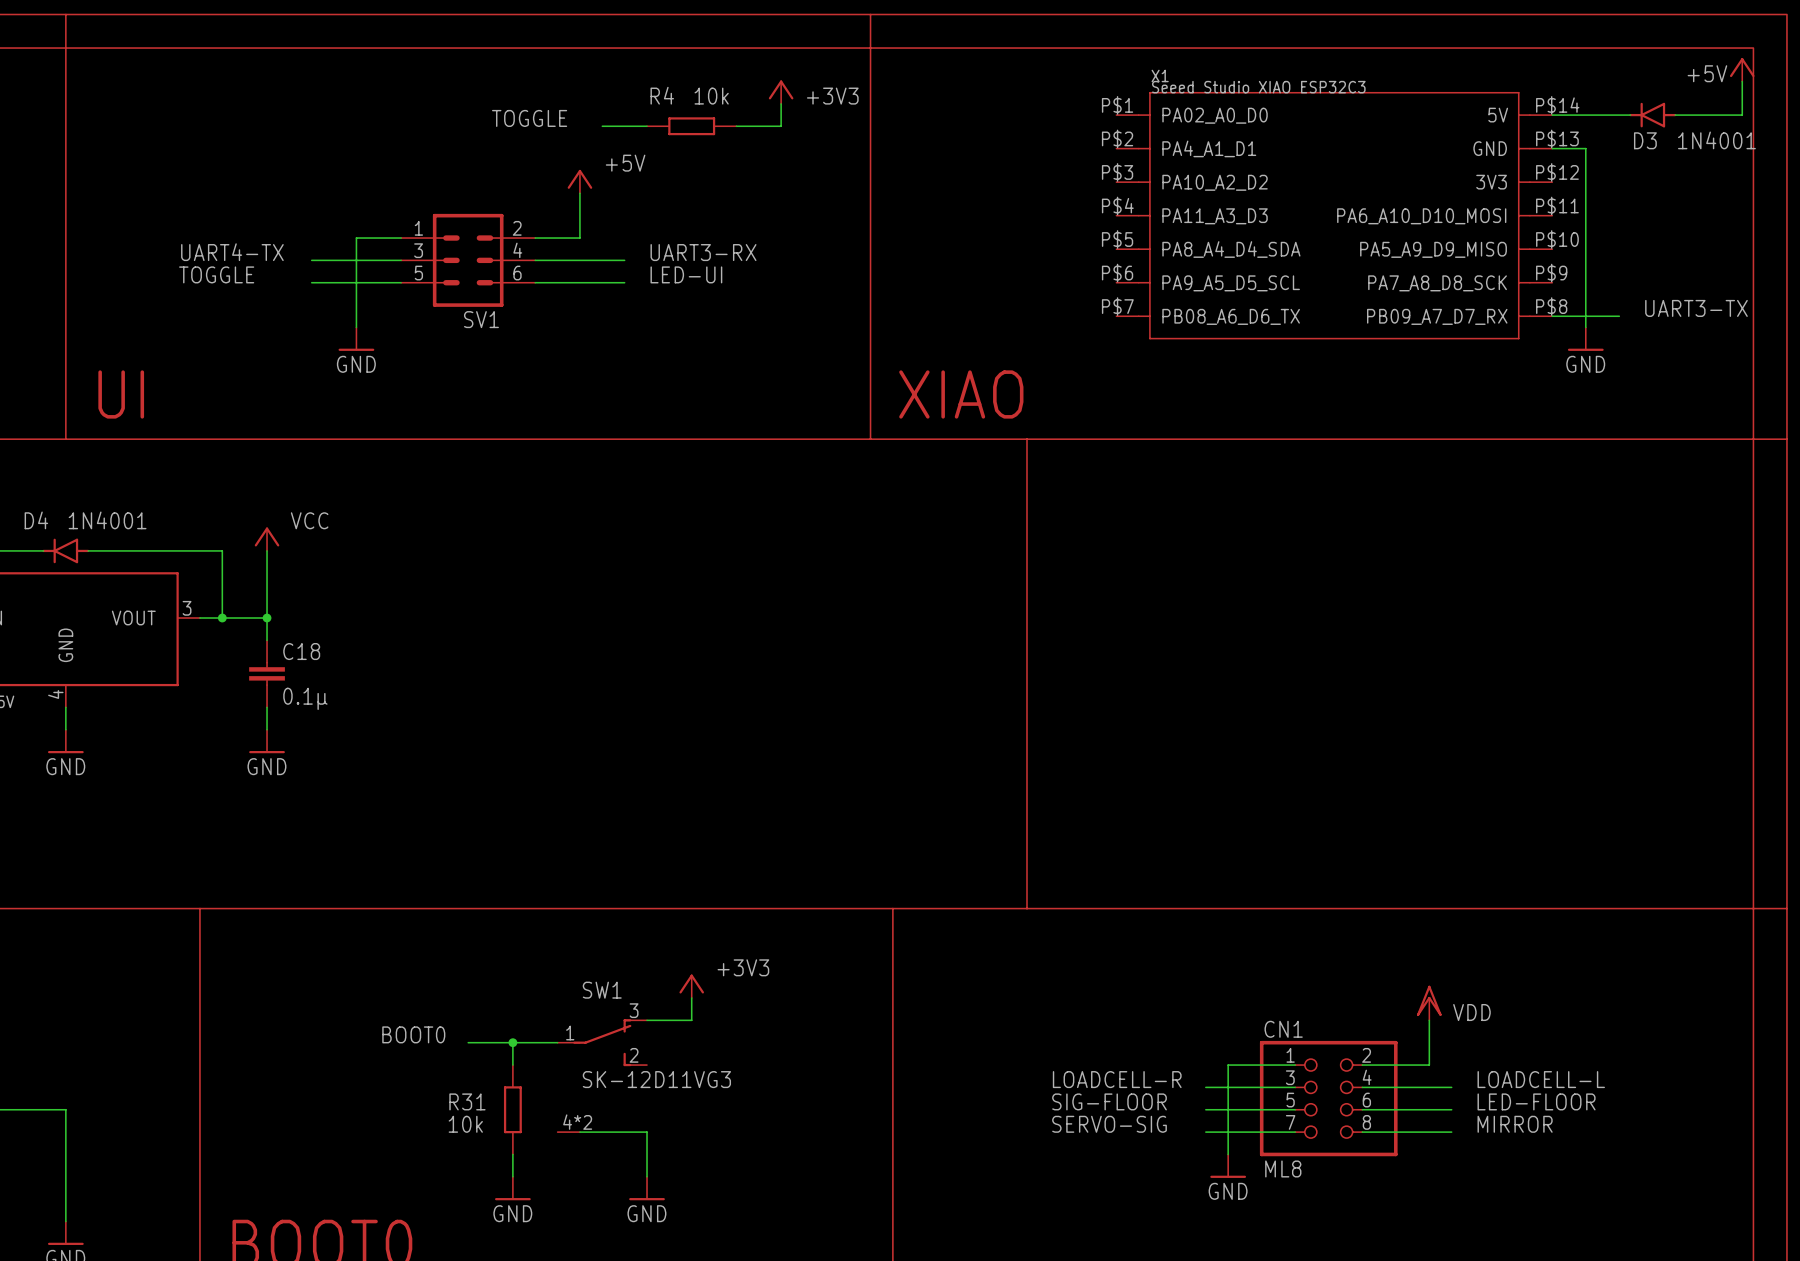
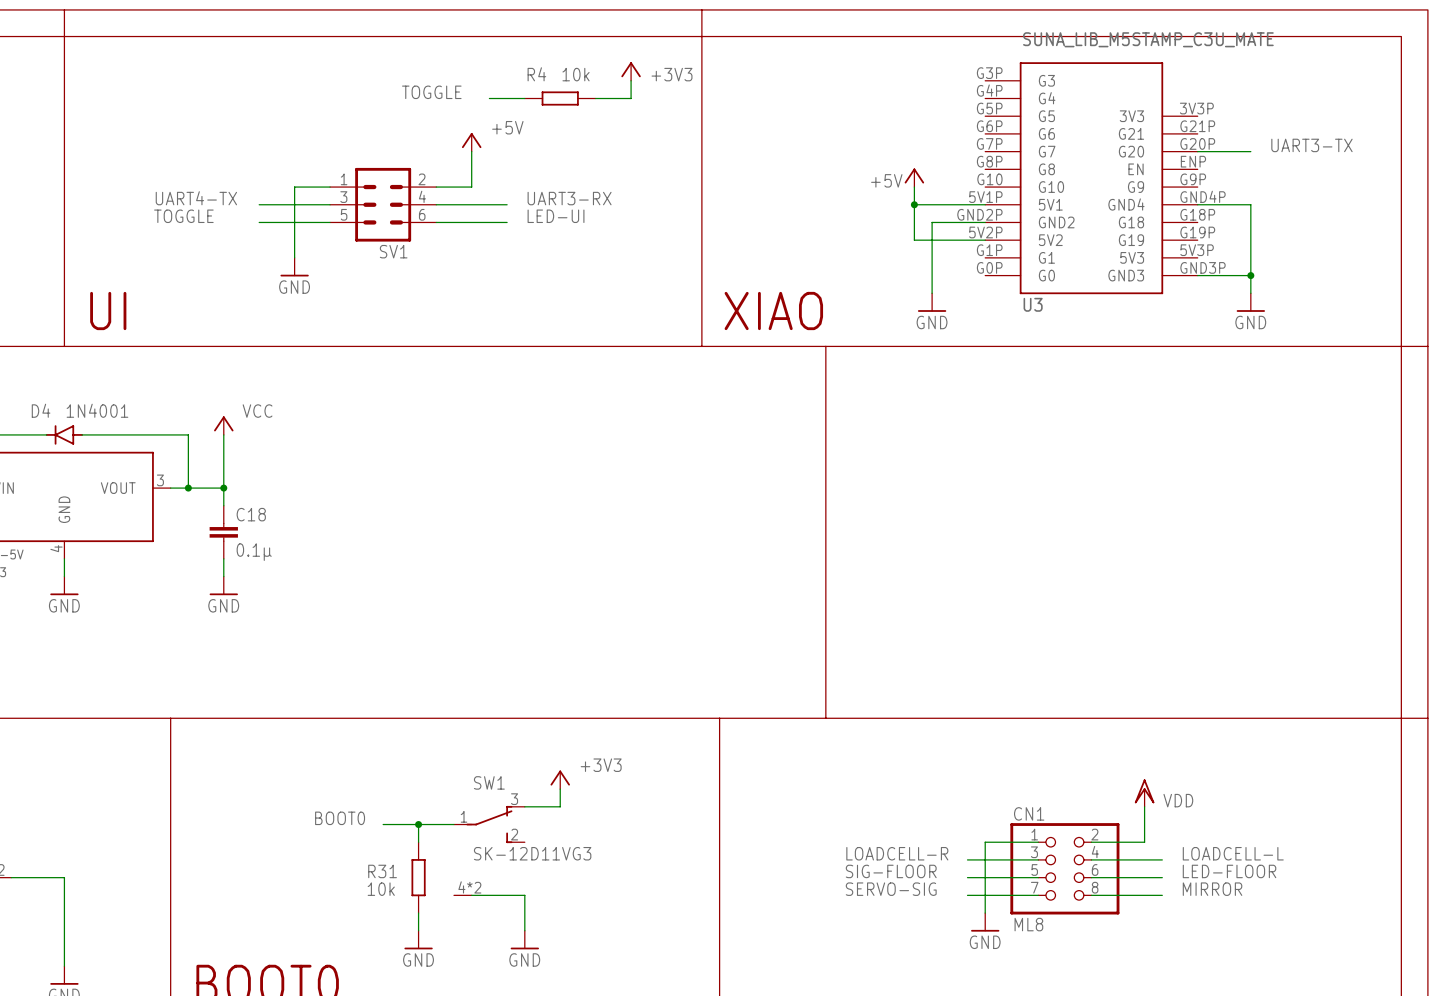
power symbol: +5V (1742, 69) -> none
wire: (1742, 81) (1742, 115) (1675, 115) -> none
wire: (1552, 115) (1630, 115) -> none
D3: 1N4001 (1652, 115) -> none
wire: (1552, 148) (1585, 148) (1585, 327) -> none
wire: none -> (1197, 151) (1250, 151)
X1: Seeed Studio XIAO ESP32C3 (1334, 215) -> none
power symbol: none -> +5V (914, 177)
U3: none -> SUNA_LIB_M5STAMP_C3U_MATE (1091, 178)
wire: none -> (914, 187) (914, 240) (985, 240)
wire: none -> (914, 204) (985, 204)
junction: none -> (914, 204)
wire: none -> (1197, 204) (1250, 204) (1250, 293)
wire: none -> (985, 222) (932, 222) (932, 293)
label position: UART3-TX (1696, 308) -> UART3-TX (1311, 145)
wire: (1552, 316) (1619, 316) -> (1197, 275) (1250, 275)
power symbol position: GND (1585, 339) -> GND (1250, 302)
junction: none -> (1250, 275)
power symbol: none -> GND (932, 302)

